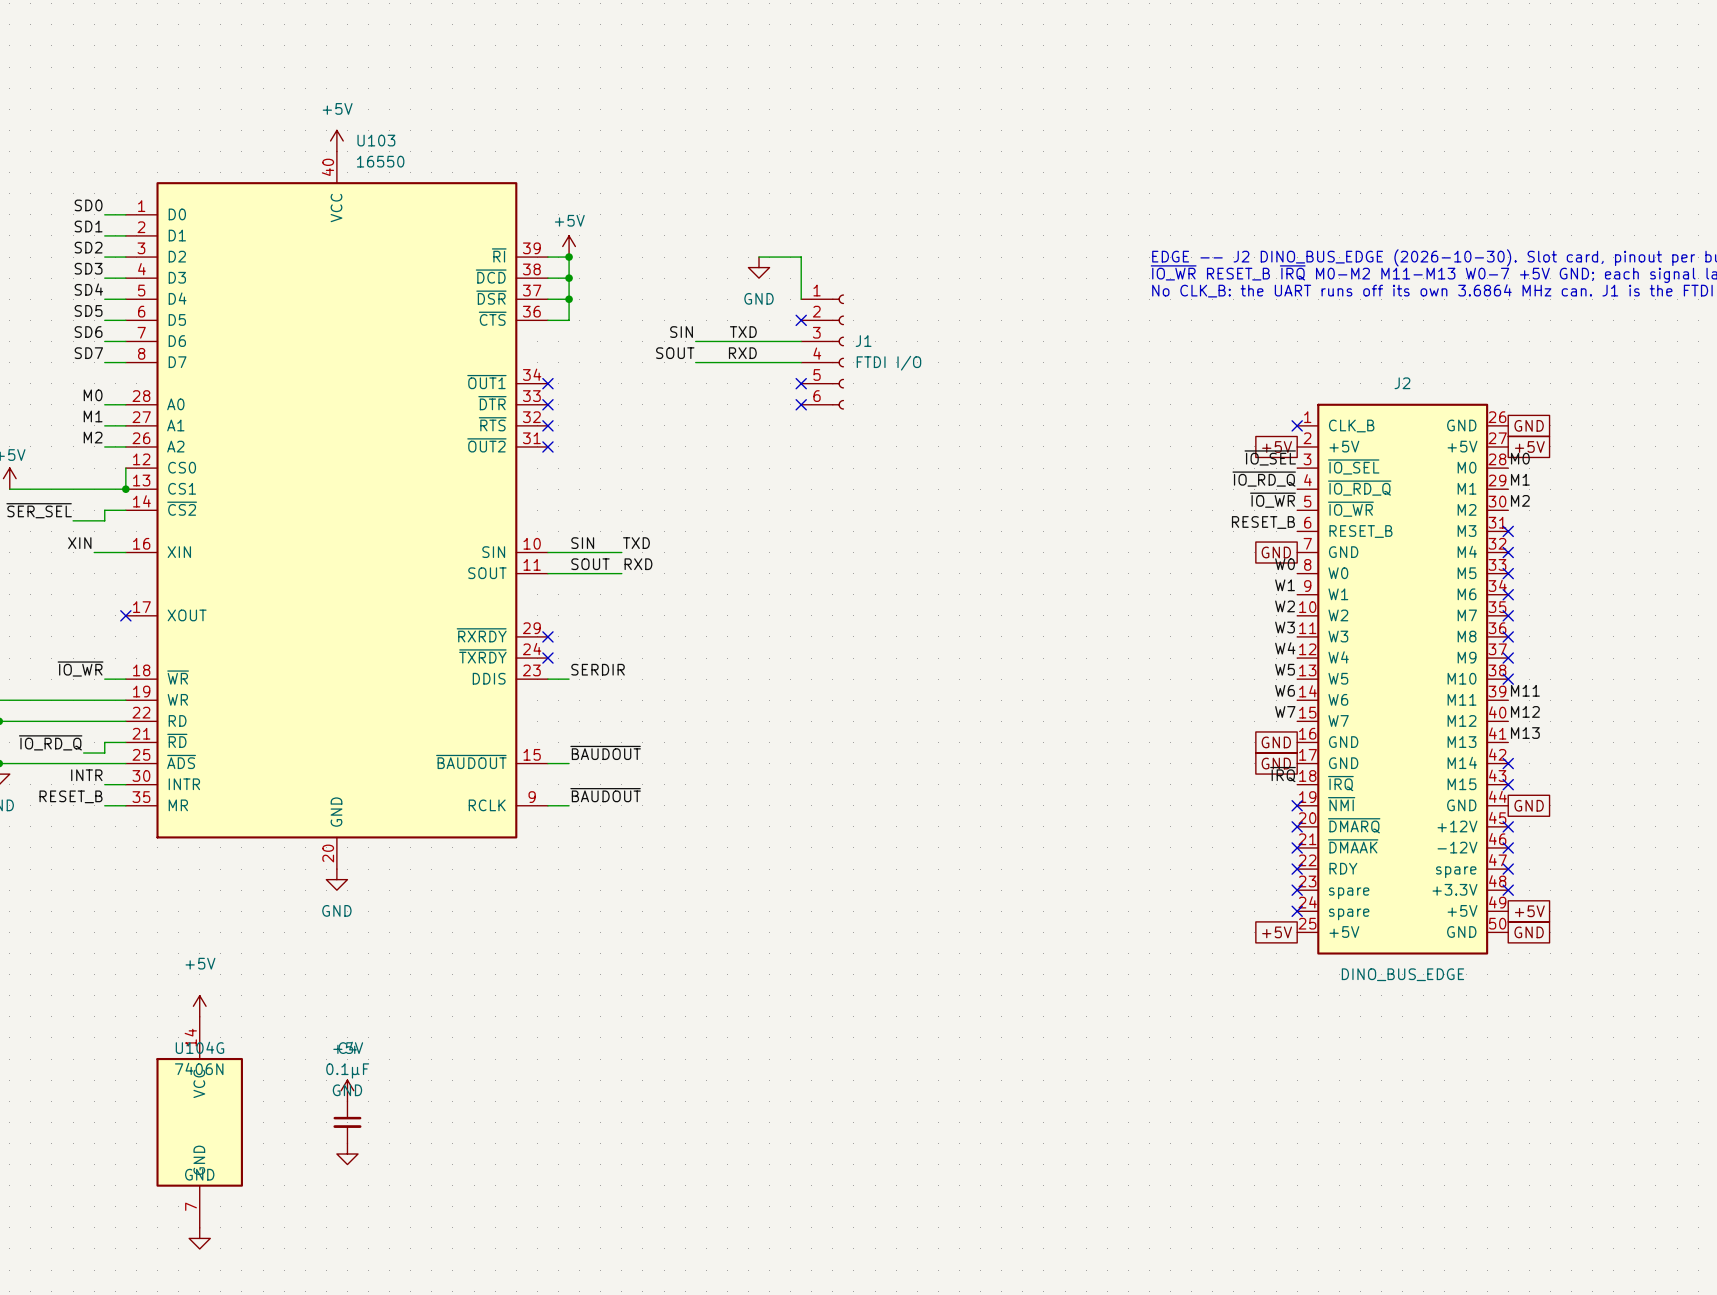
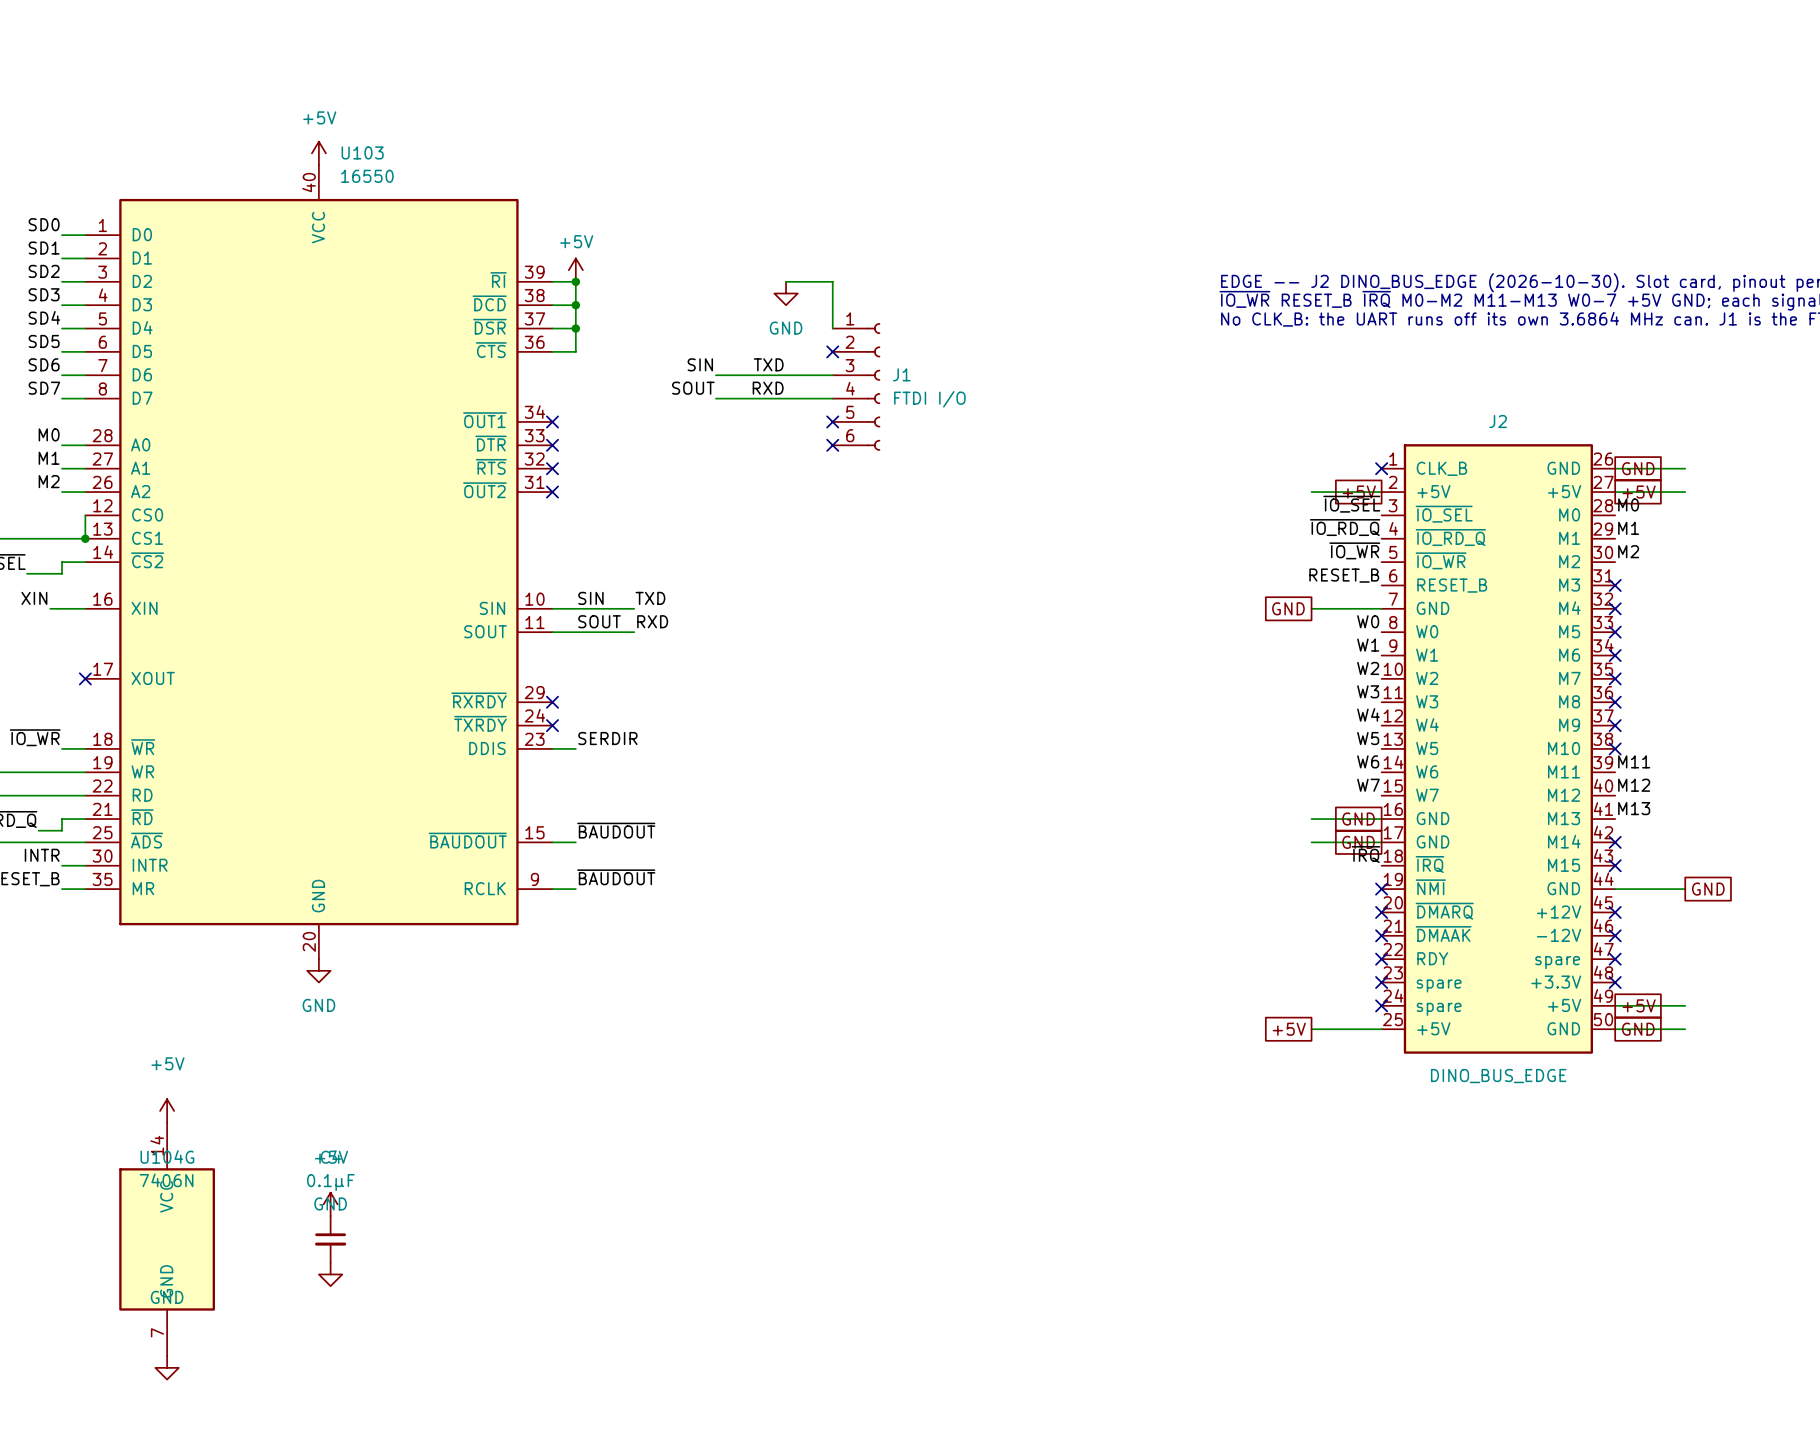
wire: none -> (1615, 468) (1685, 468)
wire: none -> (1311, 492) (1381, 492)
wire: none -> (1615, 492) (1685, 492)
wire: none -> (1311, 608) (1381, 608)
global label position: GND (1276, 552) -> GND (1288, 608)
wire: none -> (1311, 819) (1381, 819)
wire: none -> (1311, 842) (1381, 842)
wire: none -> (1615, 889) (1685, 889)
global label position: GND (1529, 805) -> GND (1708, 889)
wire: none -> (1615, 1005) (1685, 1005)
wire: none -> (1311, 1029) (1381, 1029)
global label position: +5V (1277, 932) -> +5V (1289, 1029)
wire: none -> (1615, 1029) (1685, 1029)

